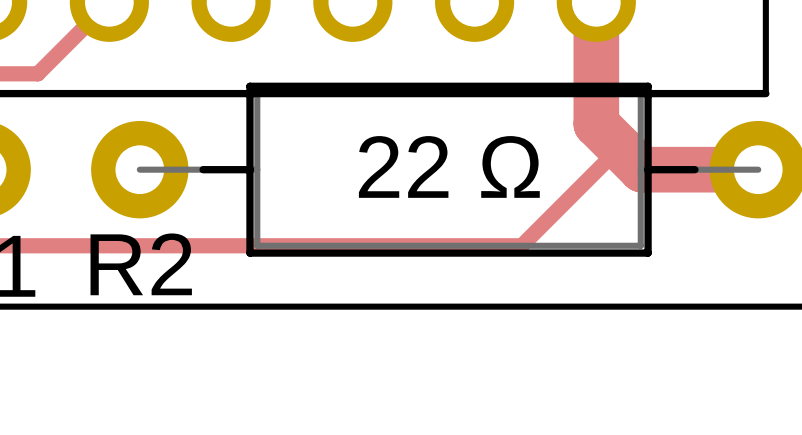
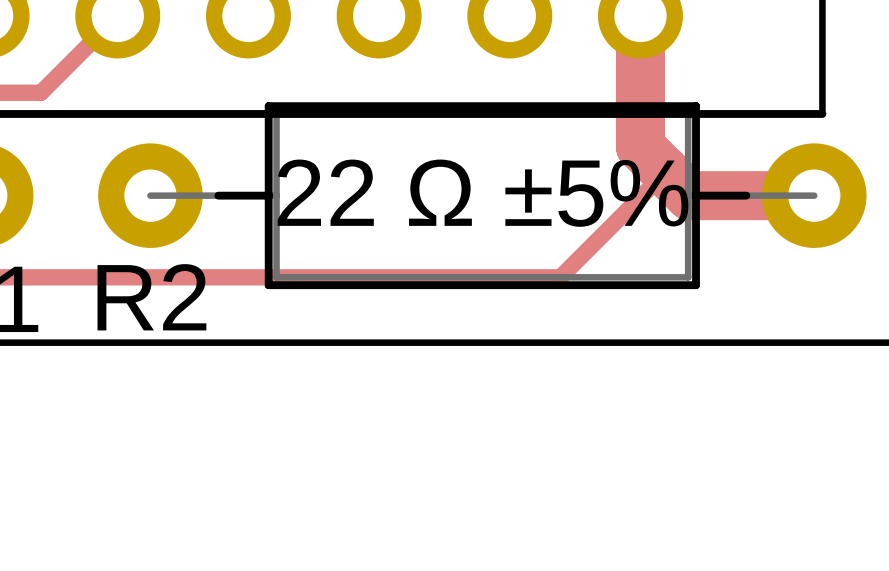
R2 value: 22 Ω (449, 166) -> 22 Ω ±5% (483, 193)

